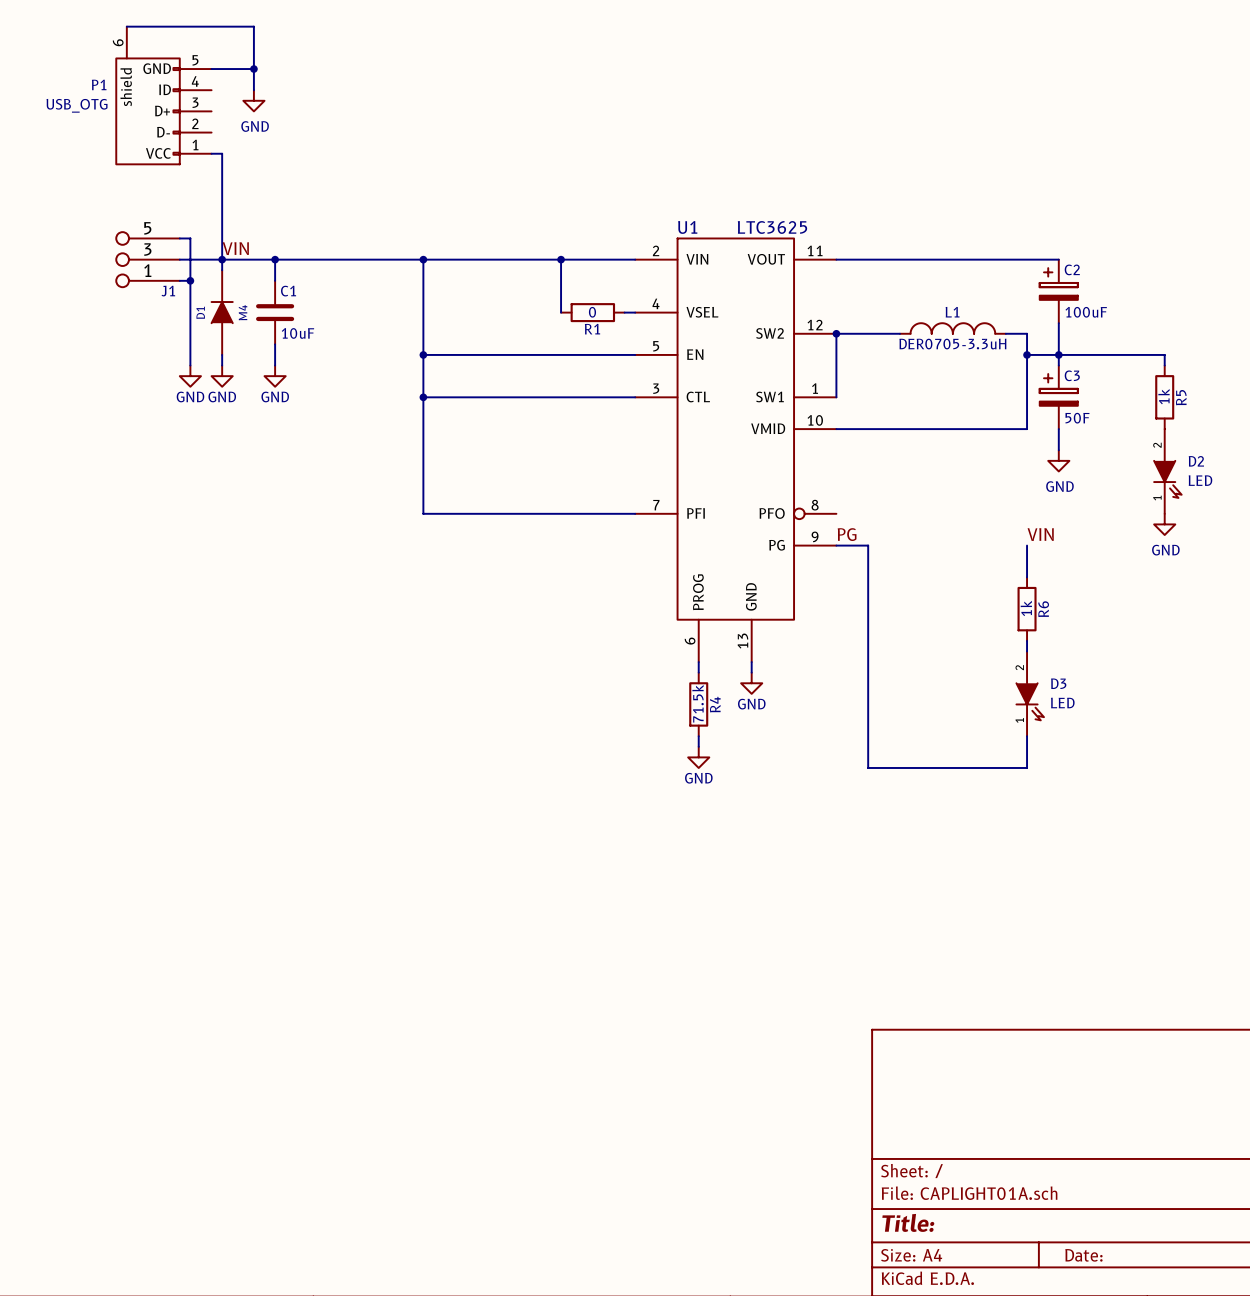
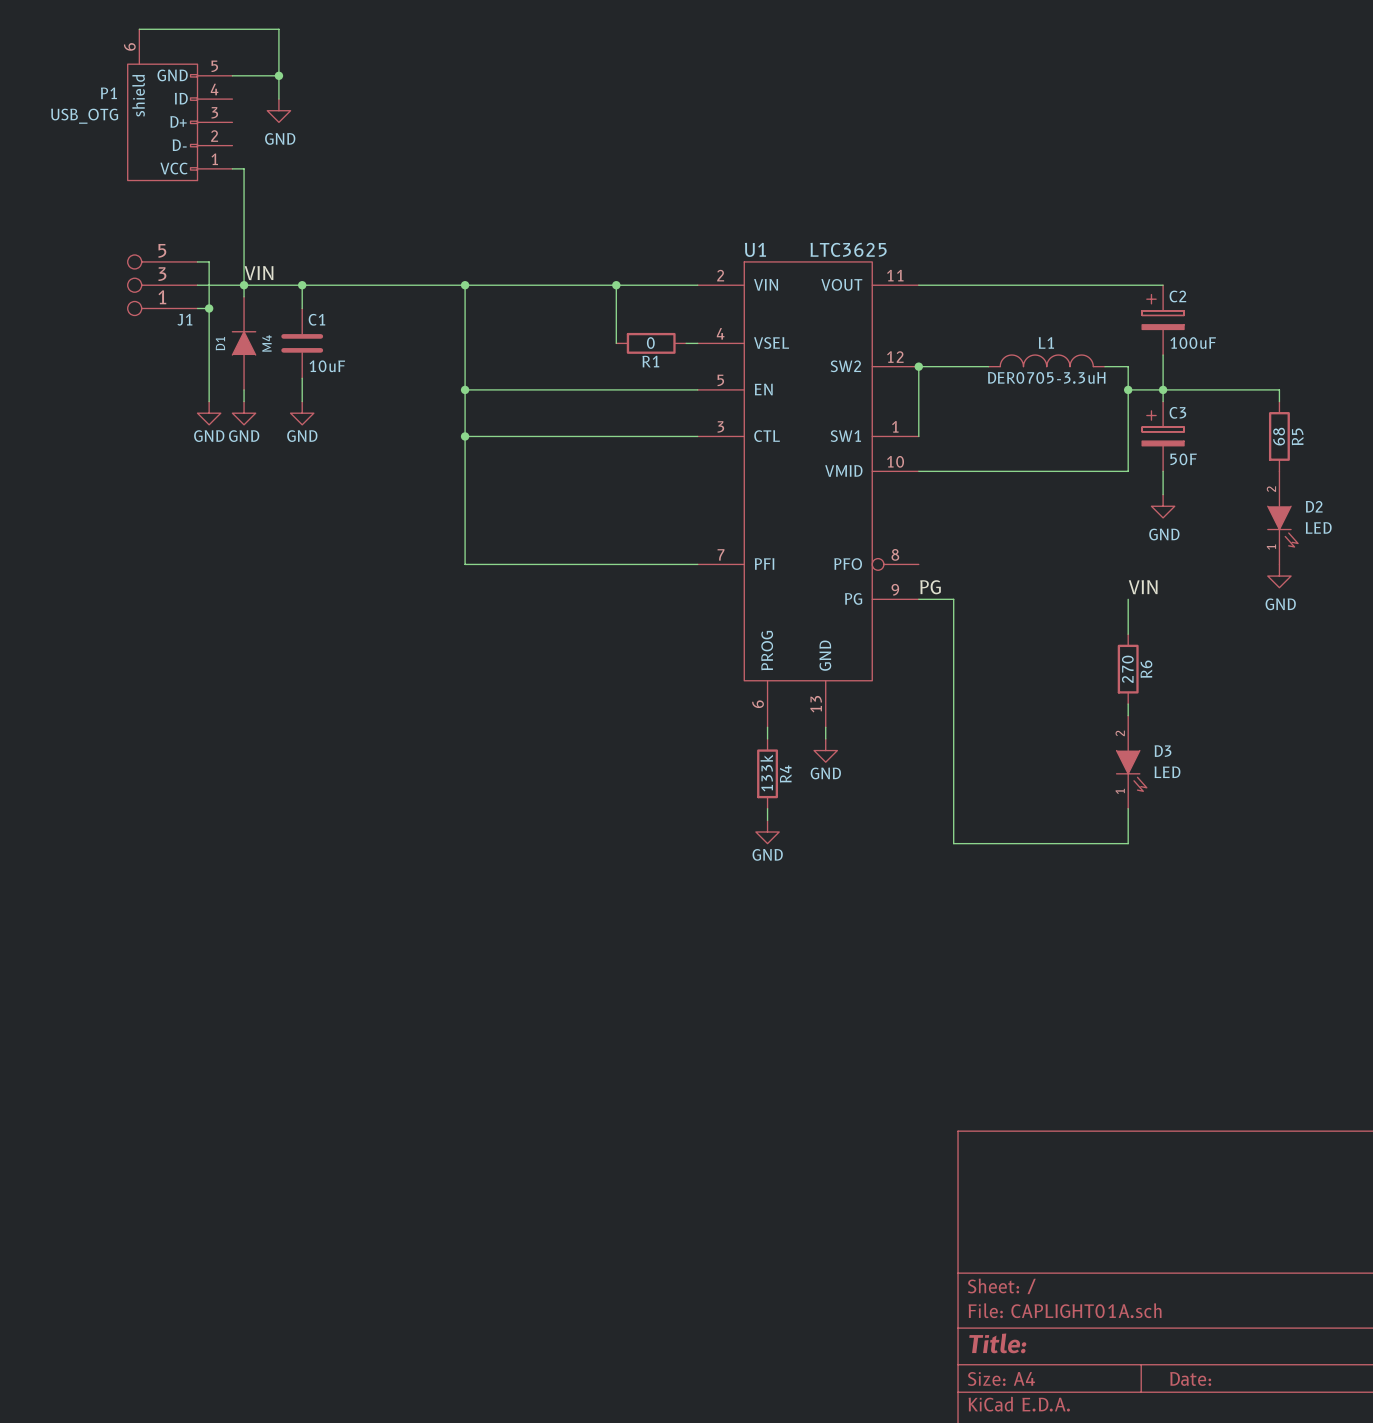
R5 value: 1k (1163, 396) -> 68 (1279, 436)
R6 value: 1k (1026, 608) -> 270 (1127, 669)
R4 value: 71.5k (698, 703) -> 133k (766, 773)

